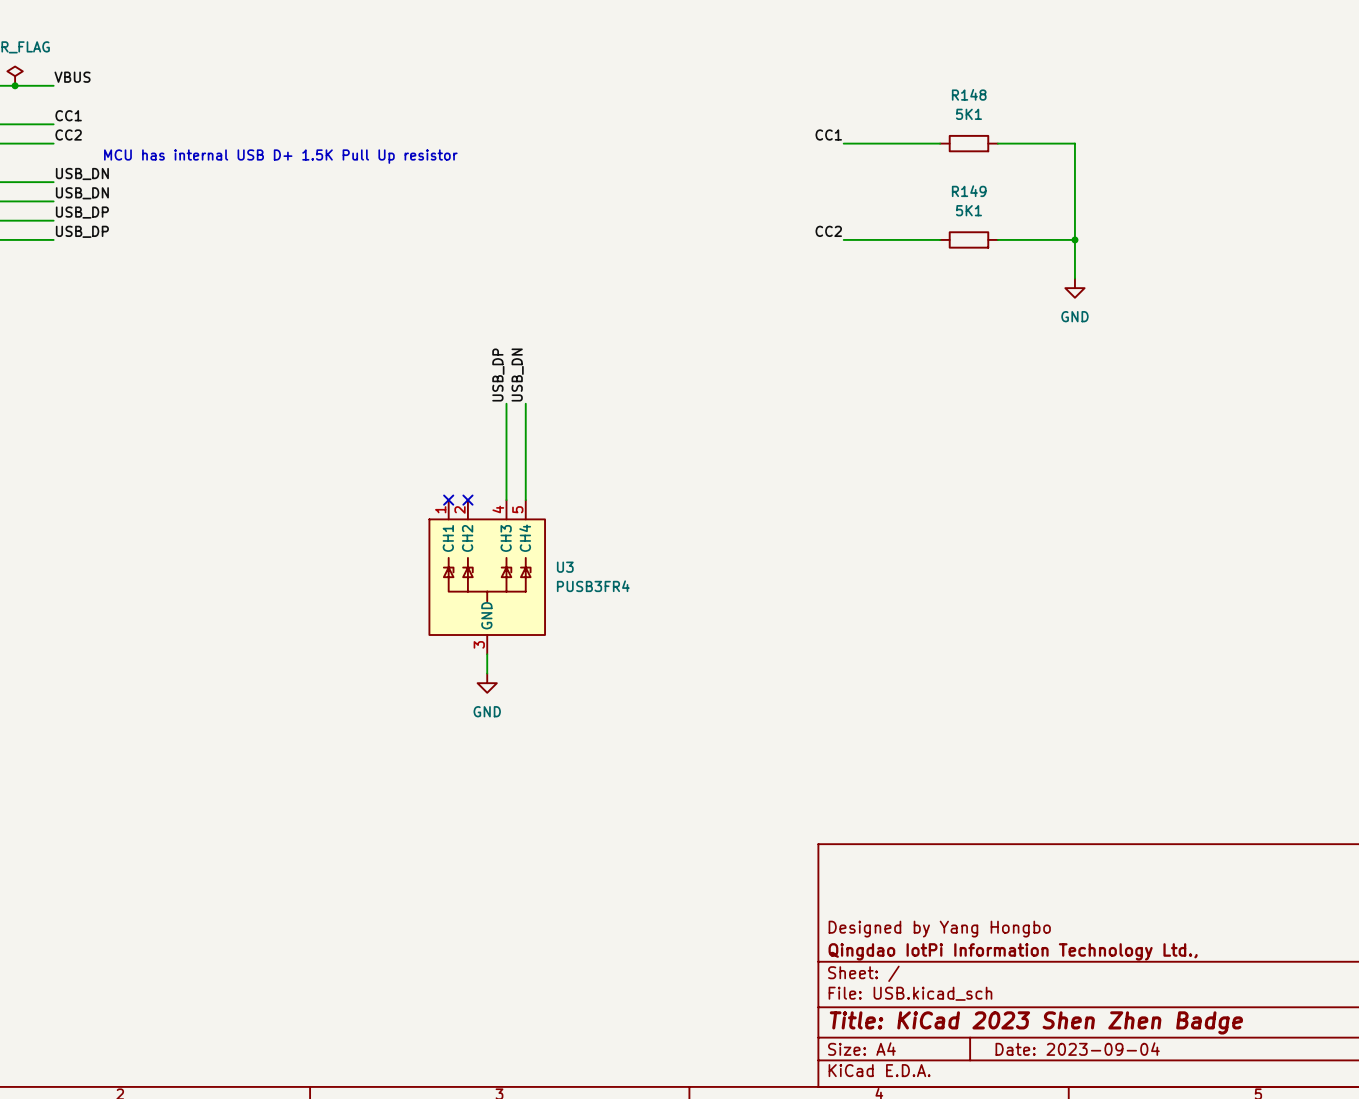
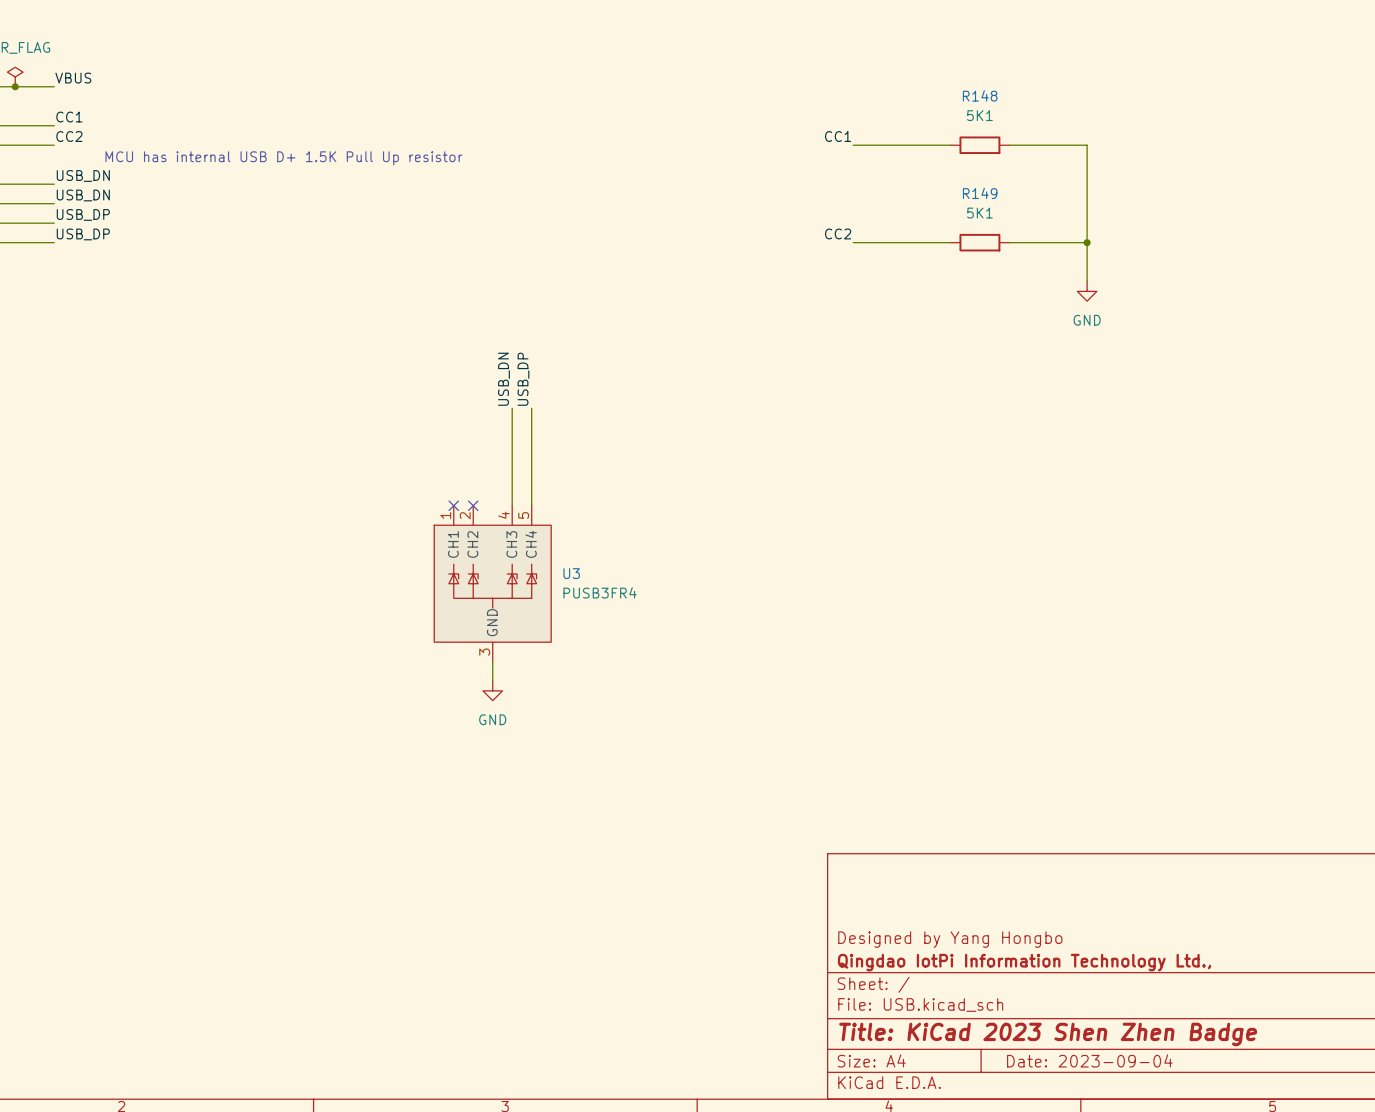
label: USB_DP (498, 375) -> USB_DN (503, 379)
label: USB_DN (517, 375) -> USB_DP (523, 379)

